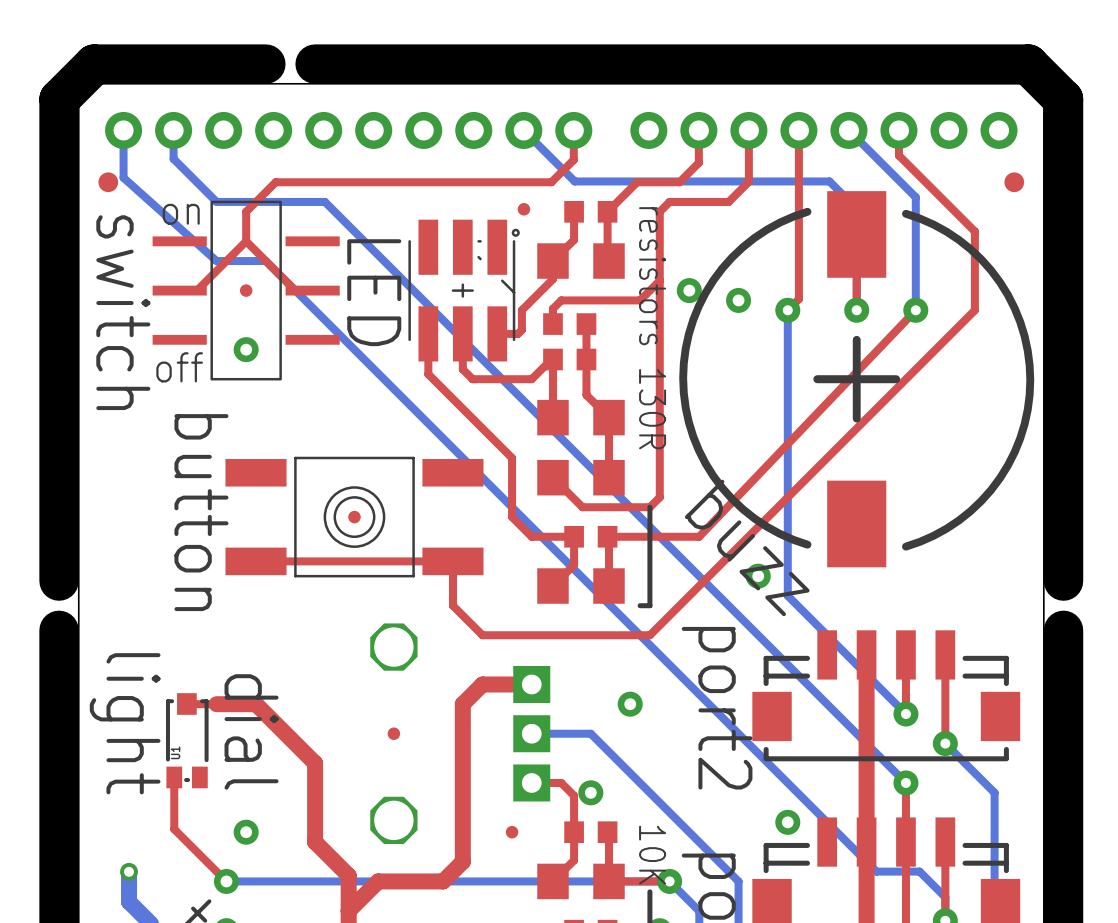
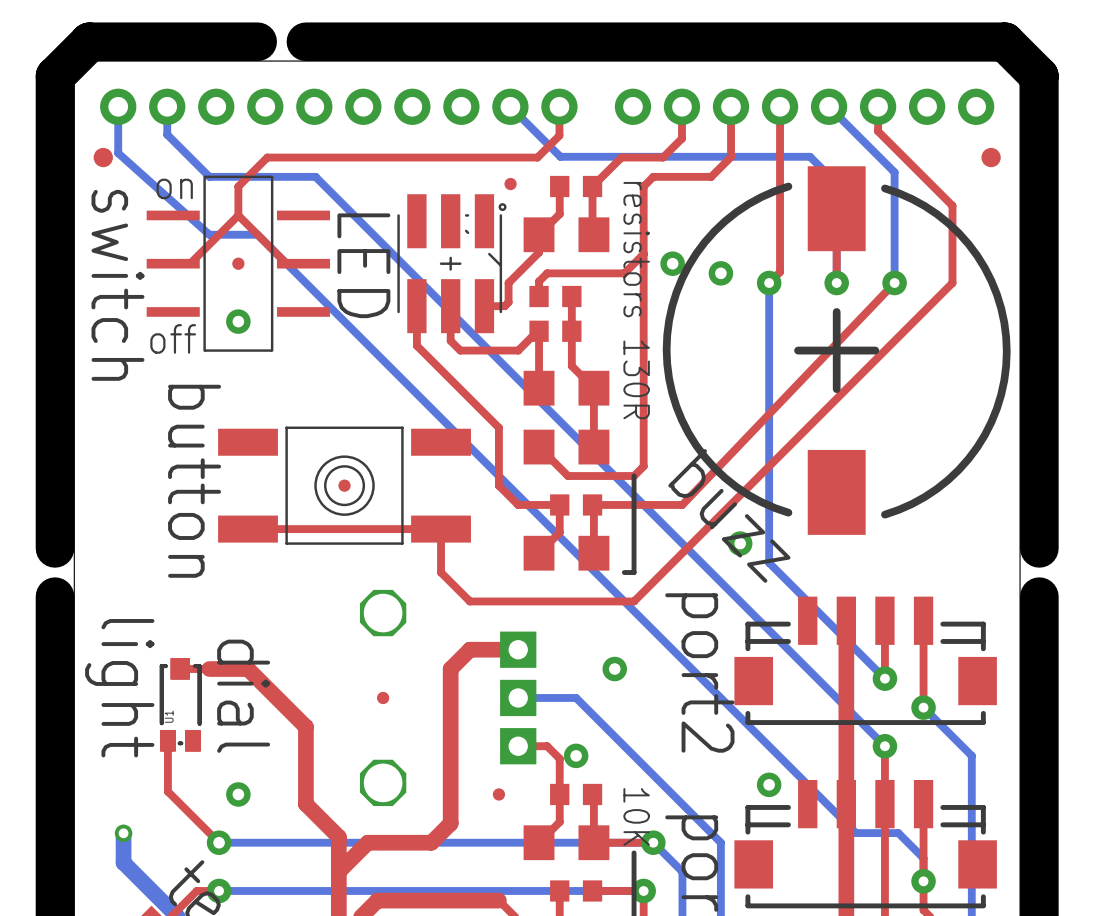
part: none -> (180, 704)

